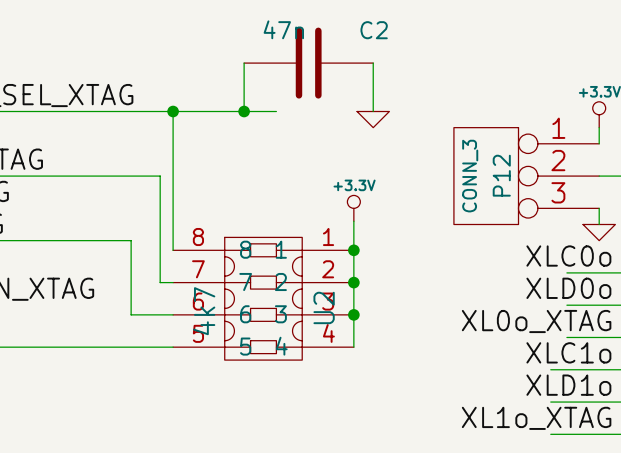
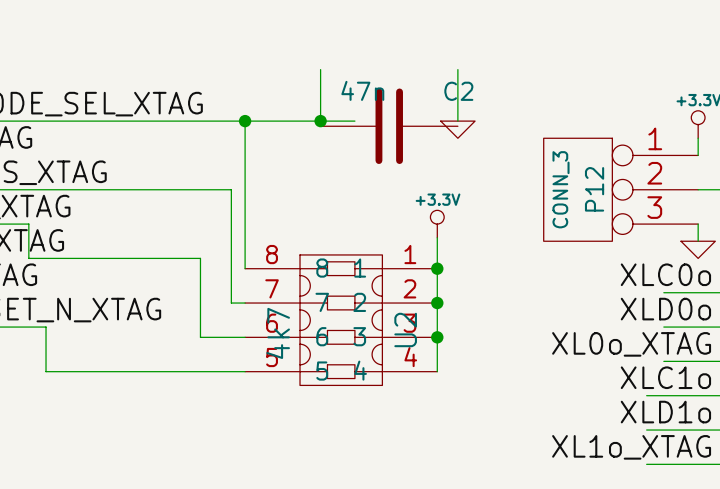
C2 position: (308, 63) -> (389, 126)

